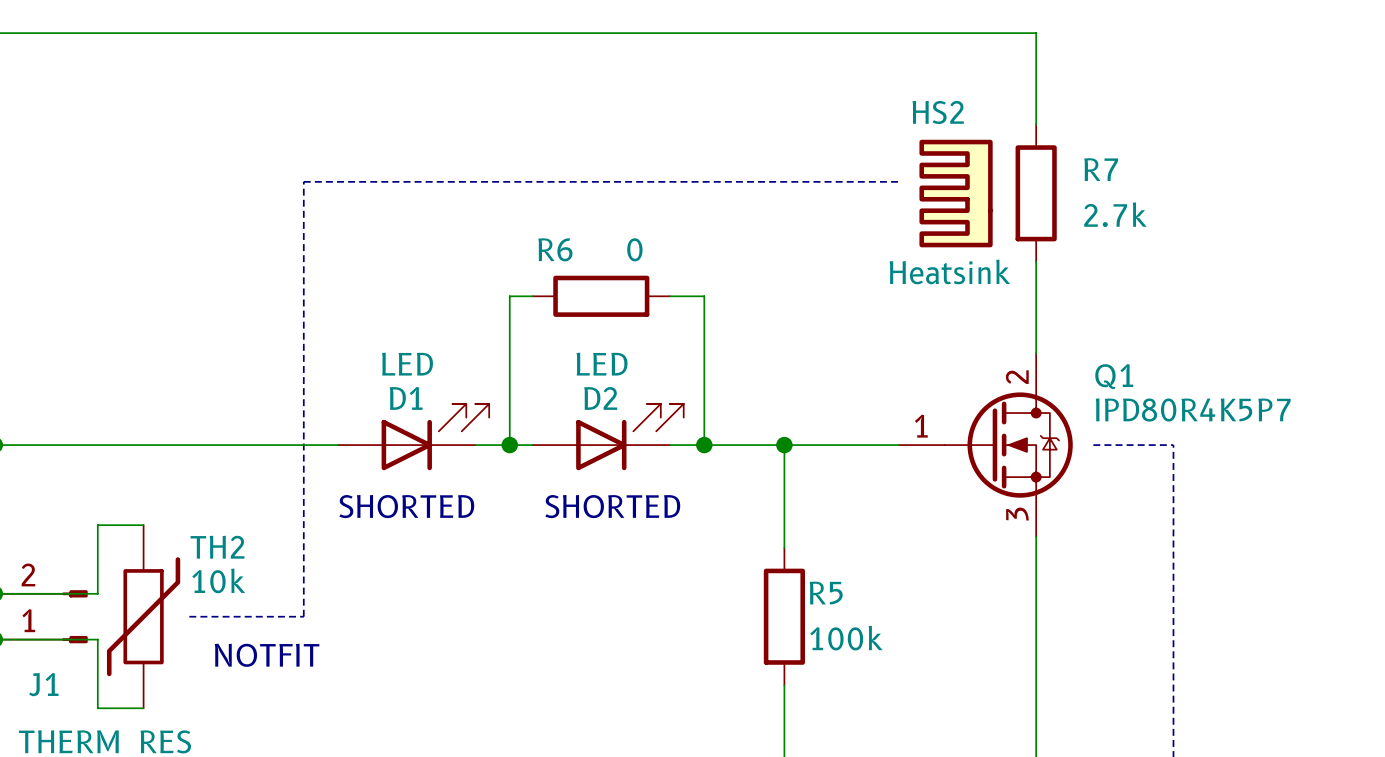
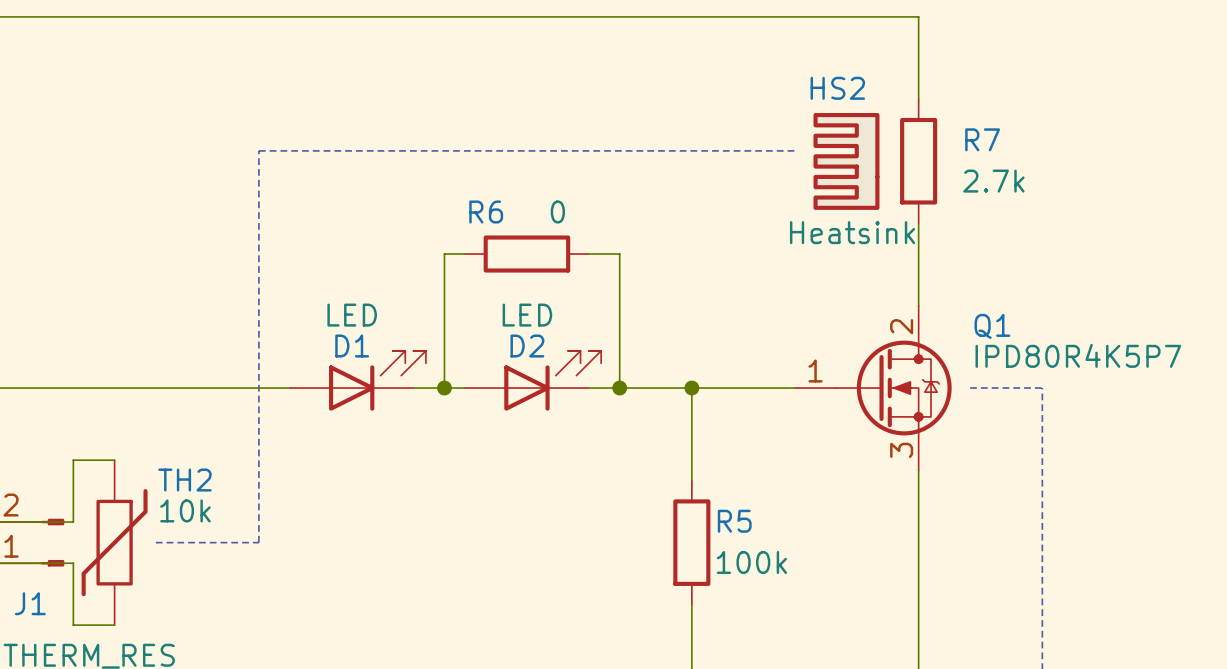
text: SHORTED (406, 506) -> none
text: SHORTED (612, 506) -> none
text: NOTFIT (267, 655) -> none

